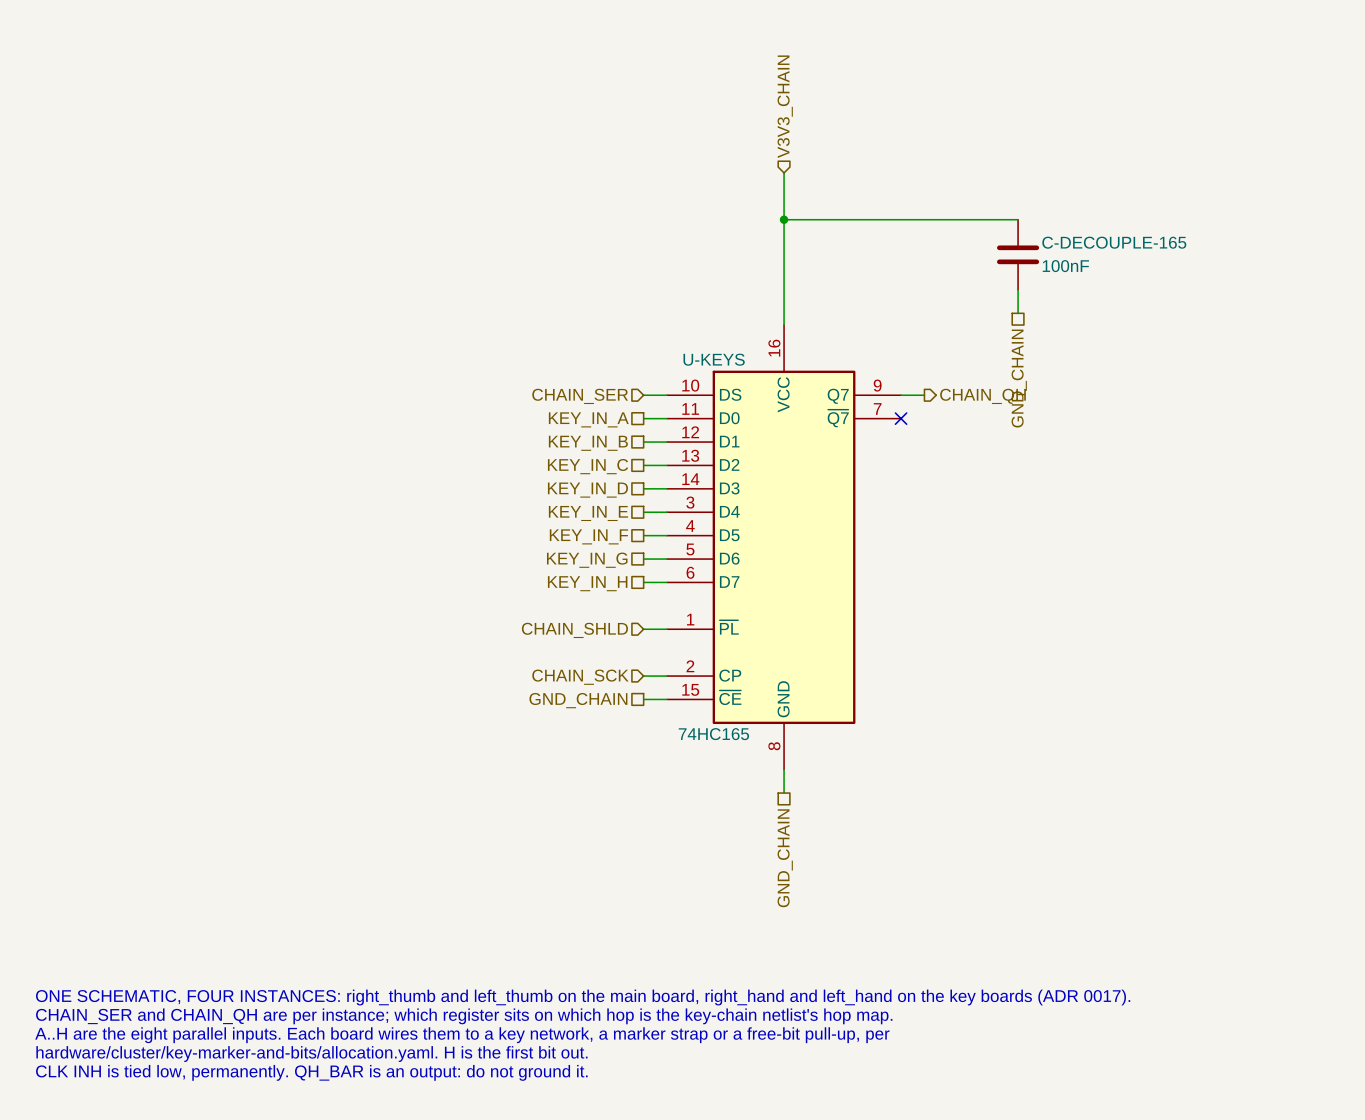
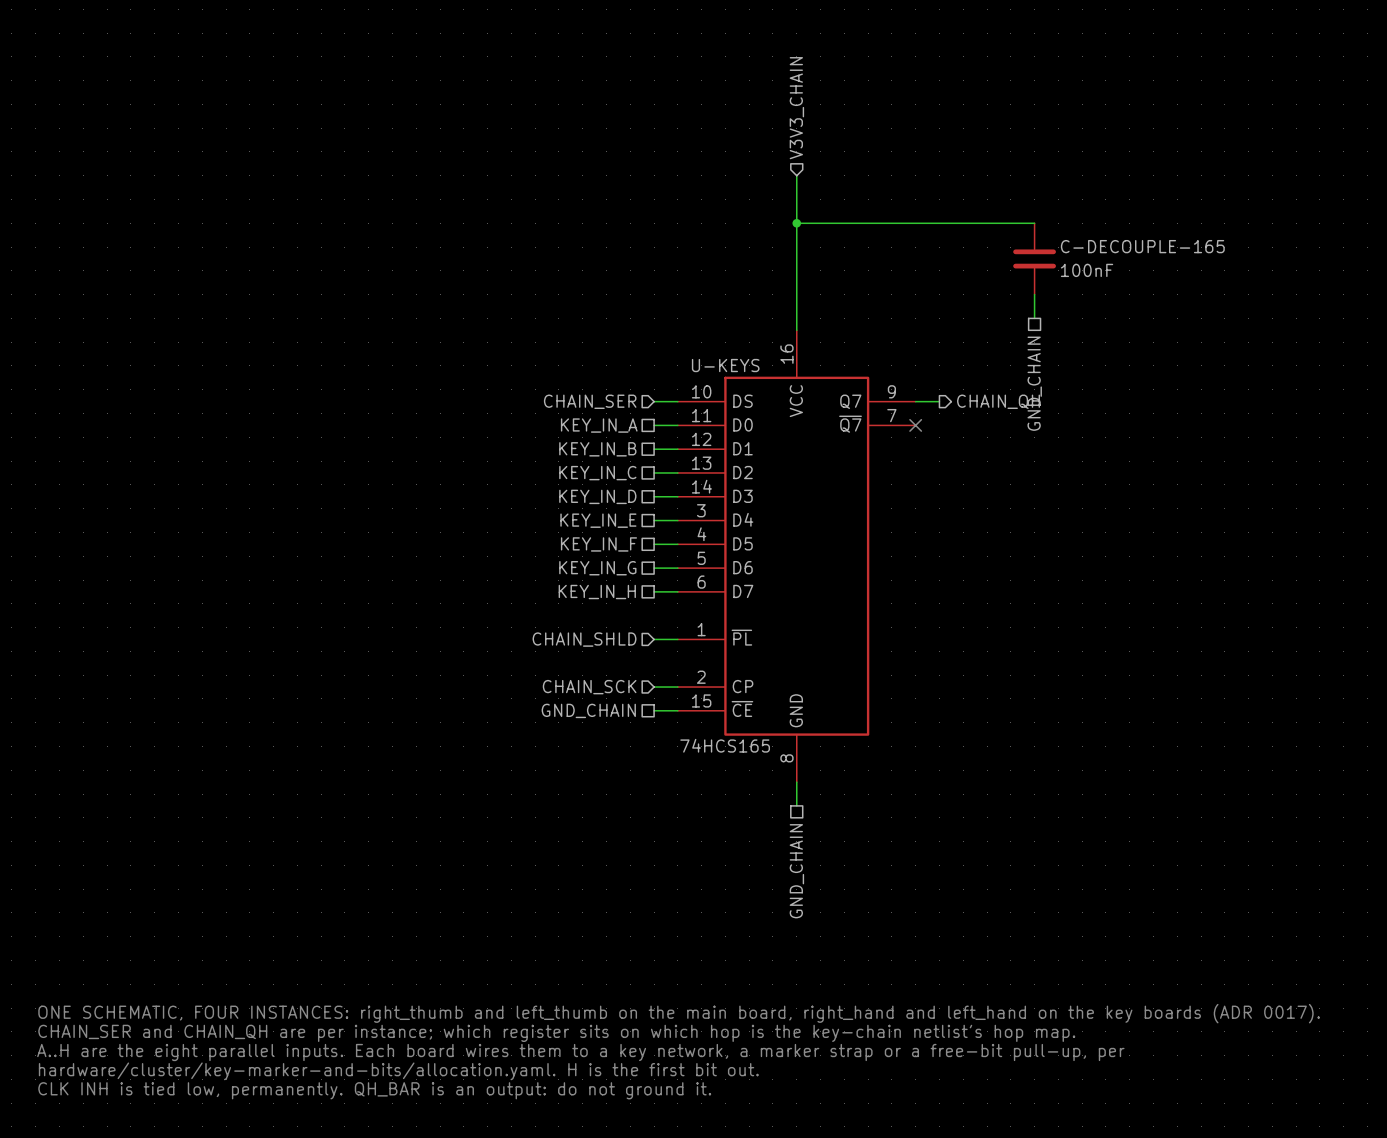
U-KEYS value: 74HC165 (713, 734) -> 74HCS165 (725, 745)

